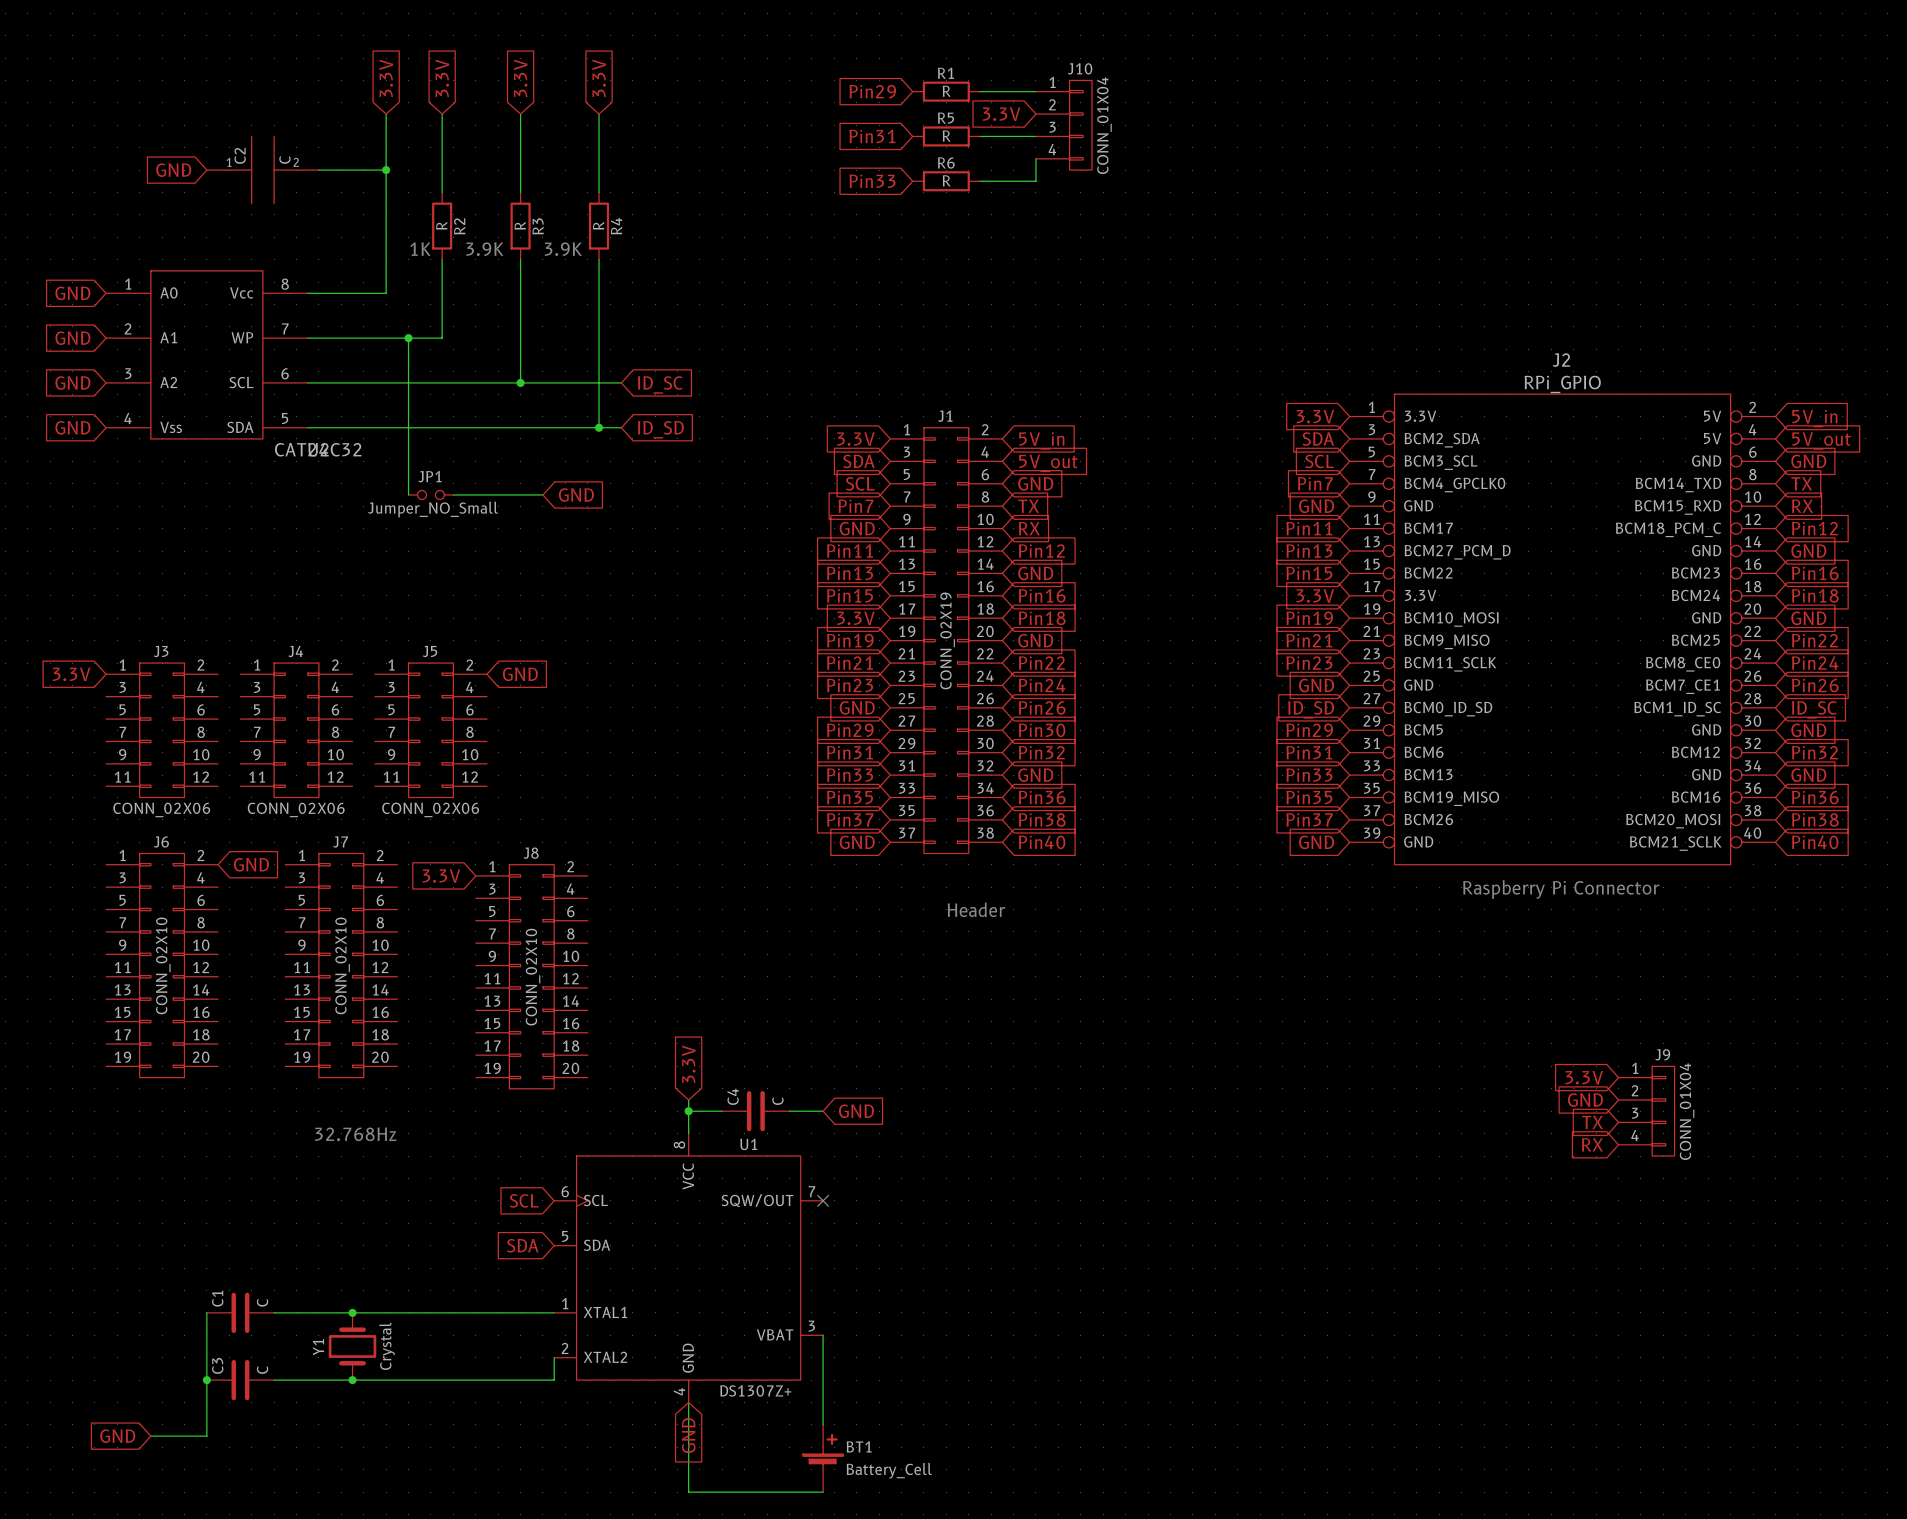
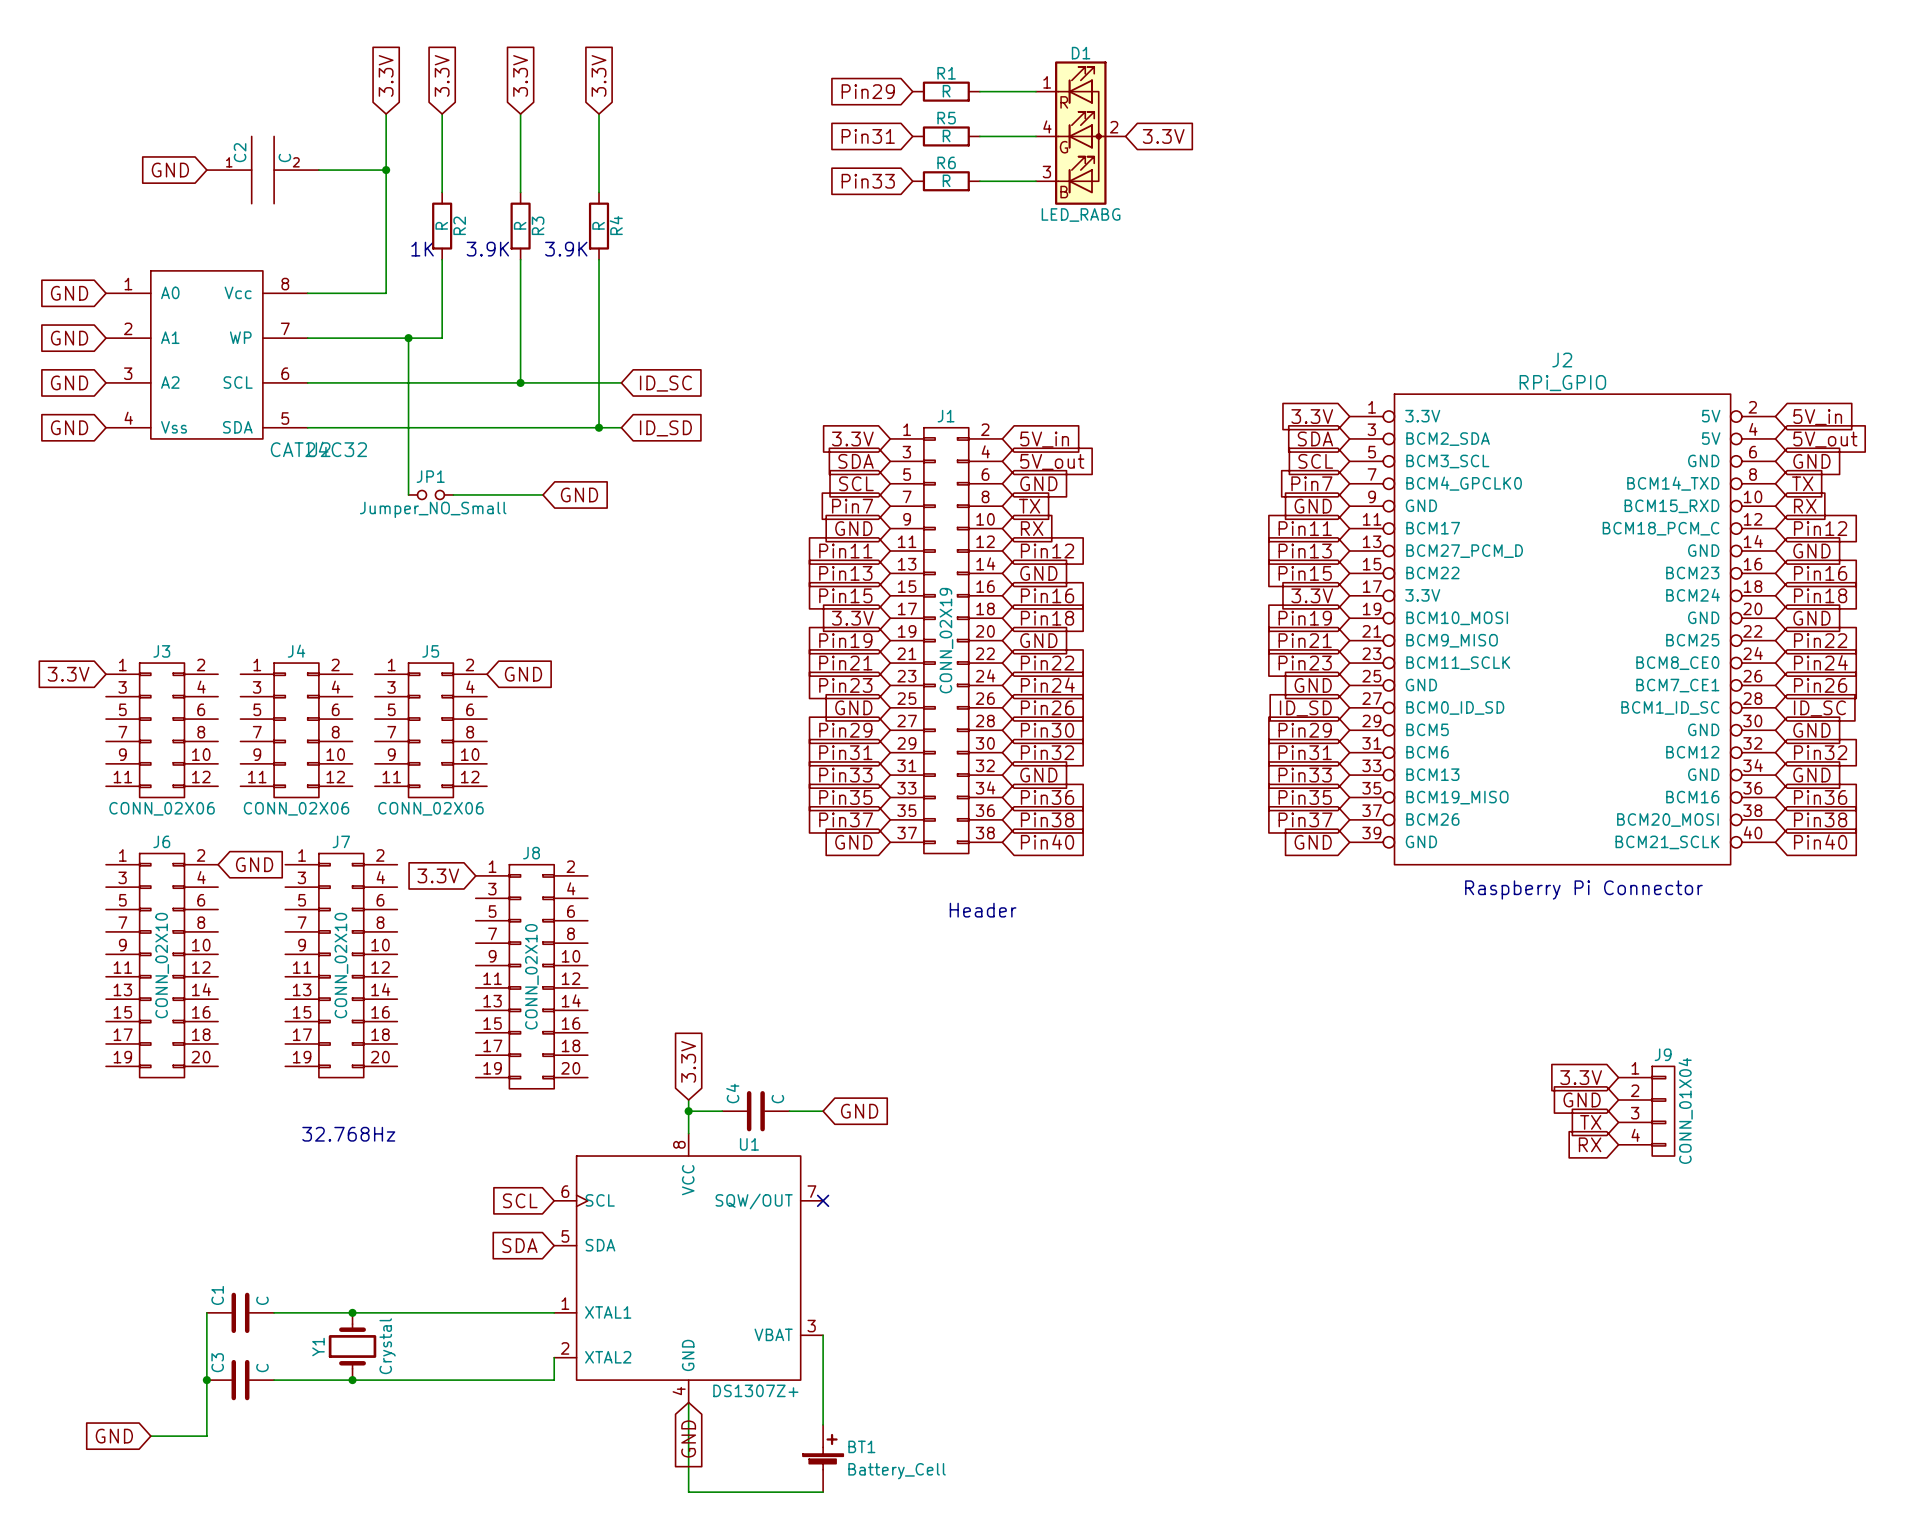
global label rotation: 0° (1001, 114) -> 180° (1163, 136)
global label position: 3.3V (1001, 114) -> 3.3V (1163, 136)
J10: CONN_01X04 (1063, 125) -> none
D1: none -> LED_RABG (1080, 133)
wire: (1035, 158) (1035, 181) -> none

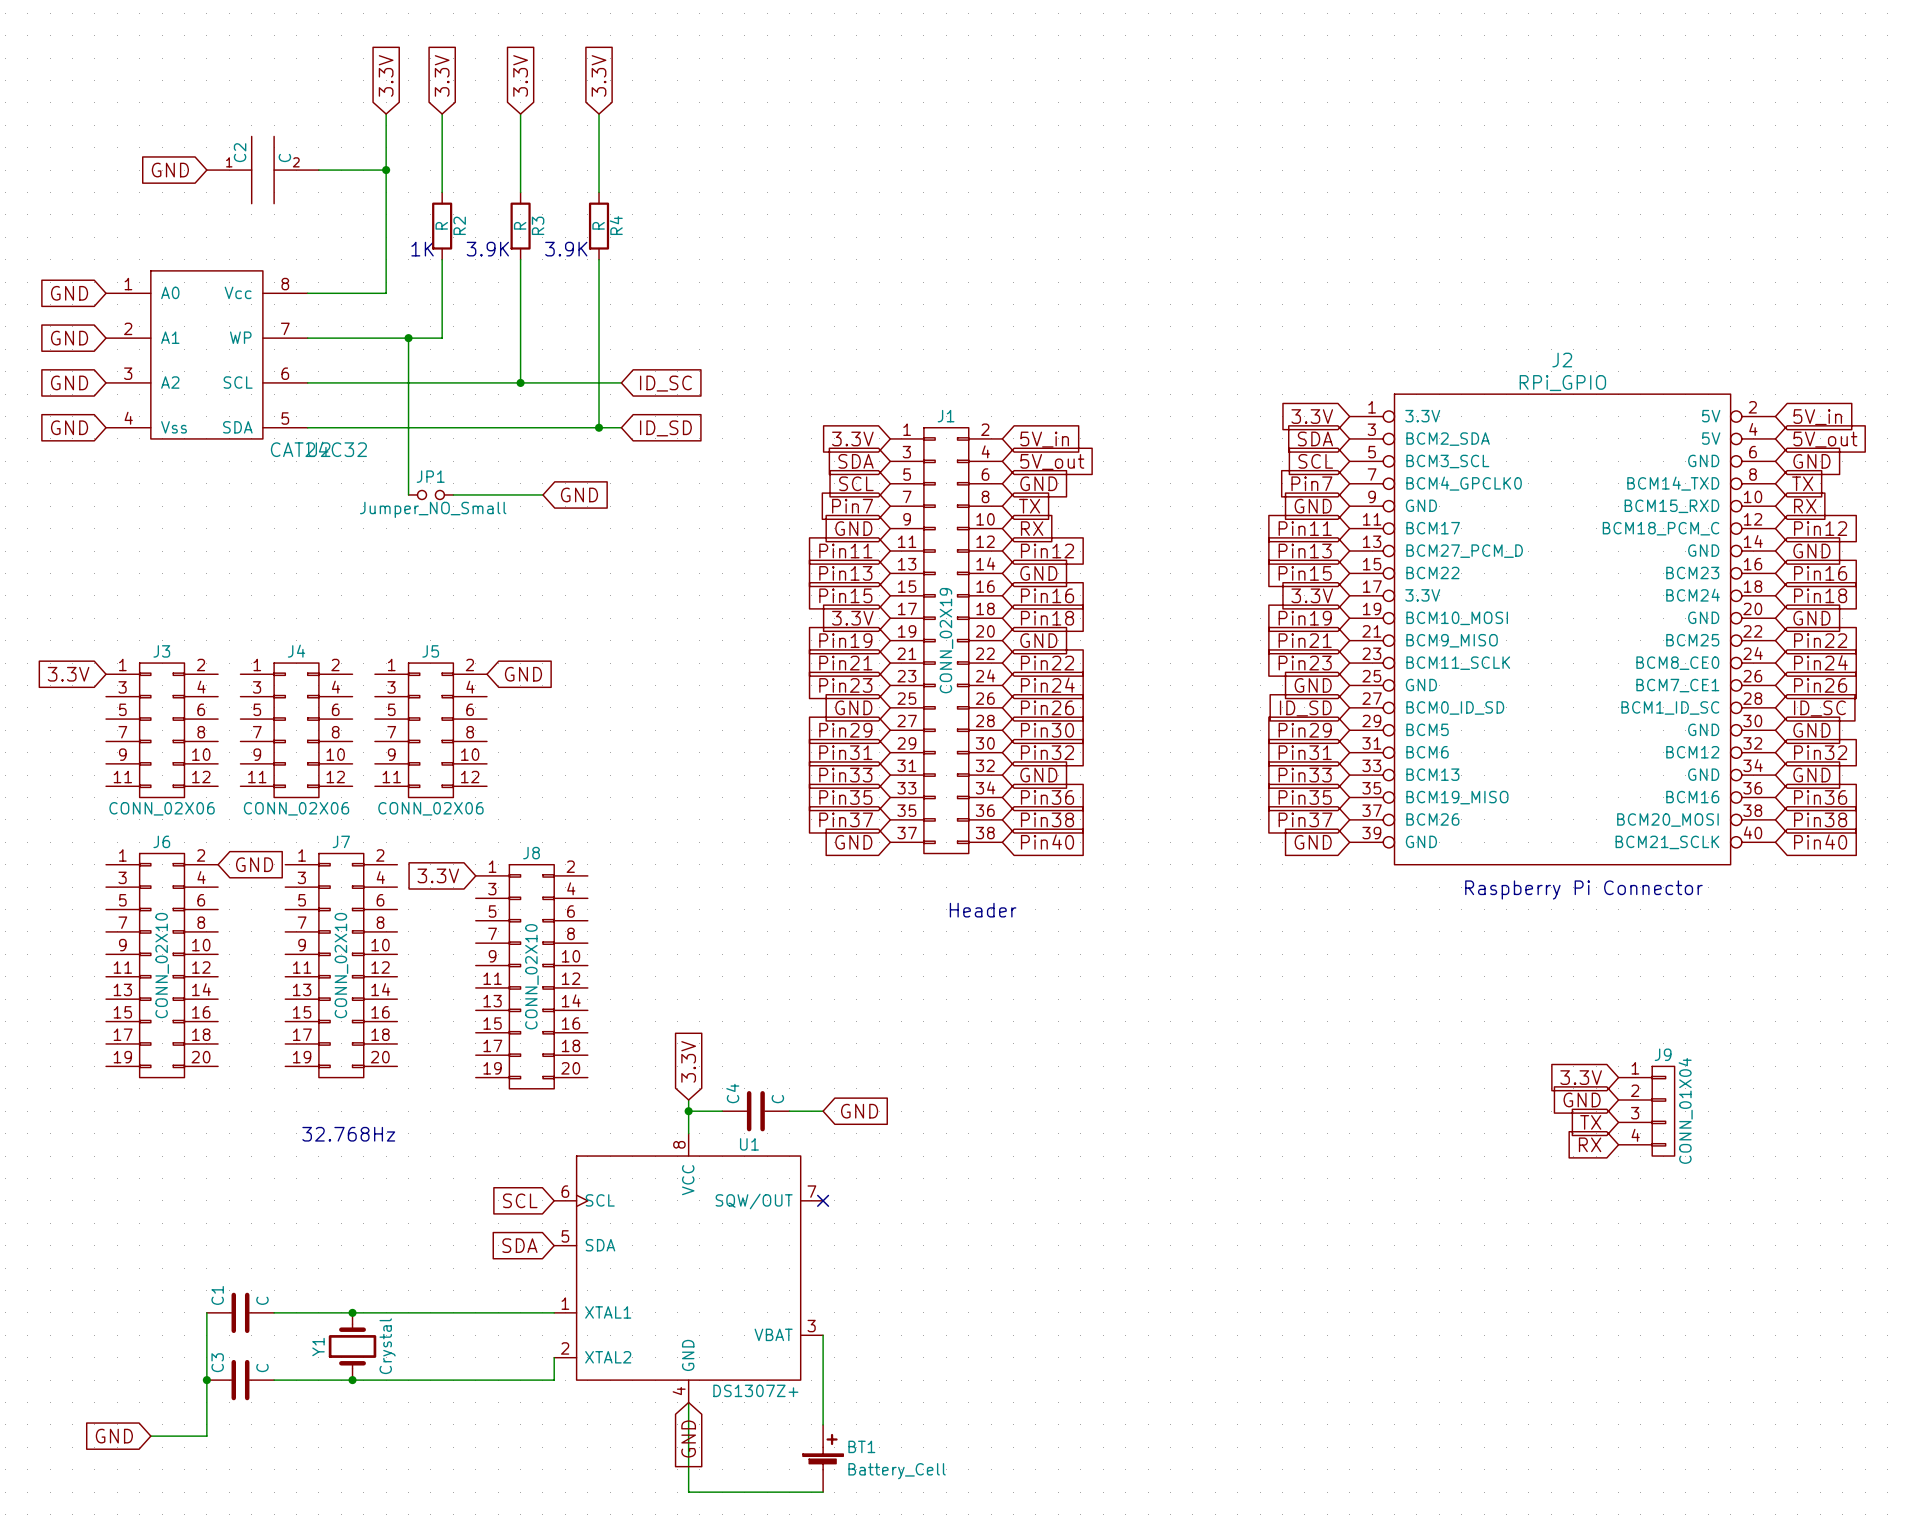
global label: Pin29 (868, 91) -> none
R1: R (946, 91) -> none
wire: (979, 91) (1035, 91) -> none
D1: LED_RABG (1080, 133) -> none
global label: Pin31 (868, 136) -> none
R5: R (946, 136) -> none
wire: (979, 136) (1035, 136) -> none
global label: 3.3V (1163, 136) -> none
global label: Pin33 (868, 181) -> none
R6: R (946, 181) -> none
wire: (979, 181) (1035, 181) -> none

